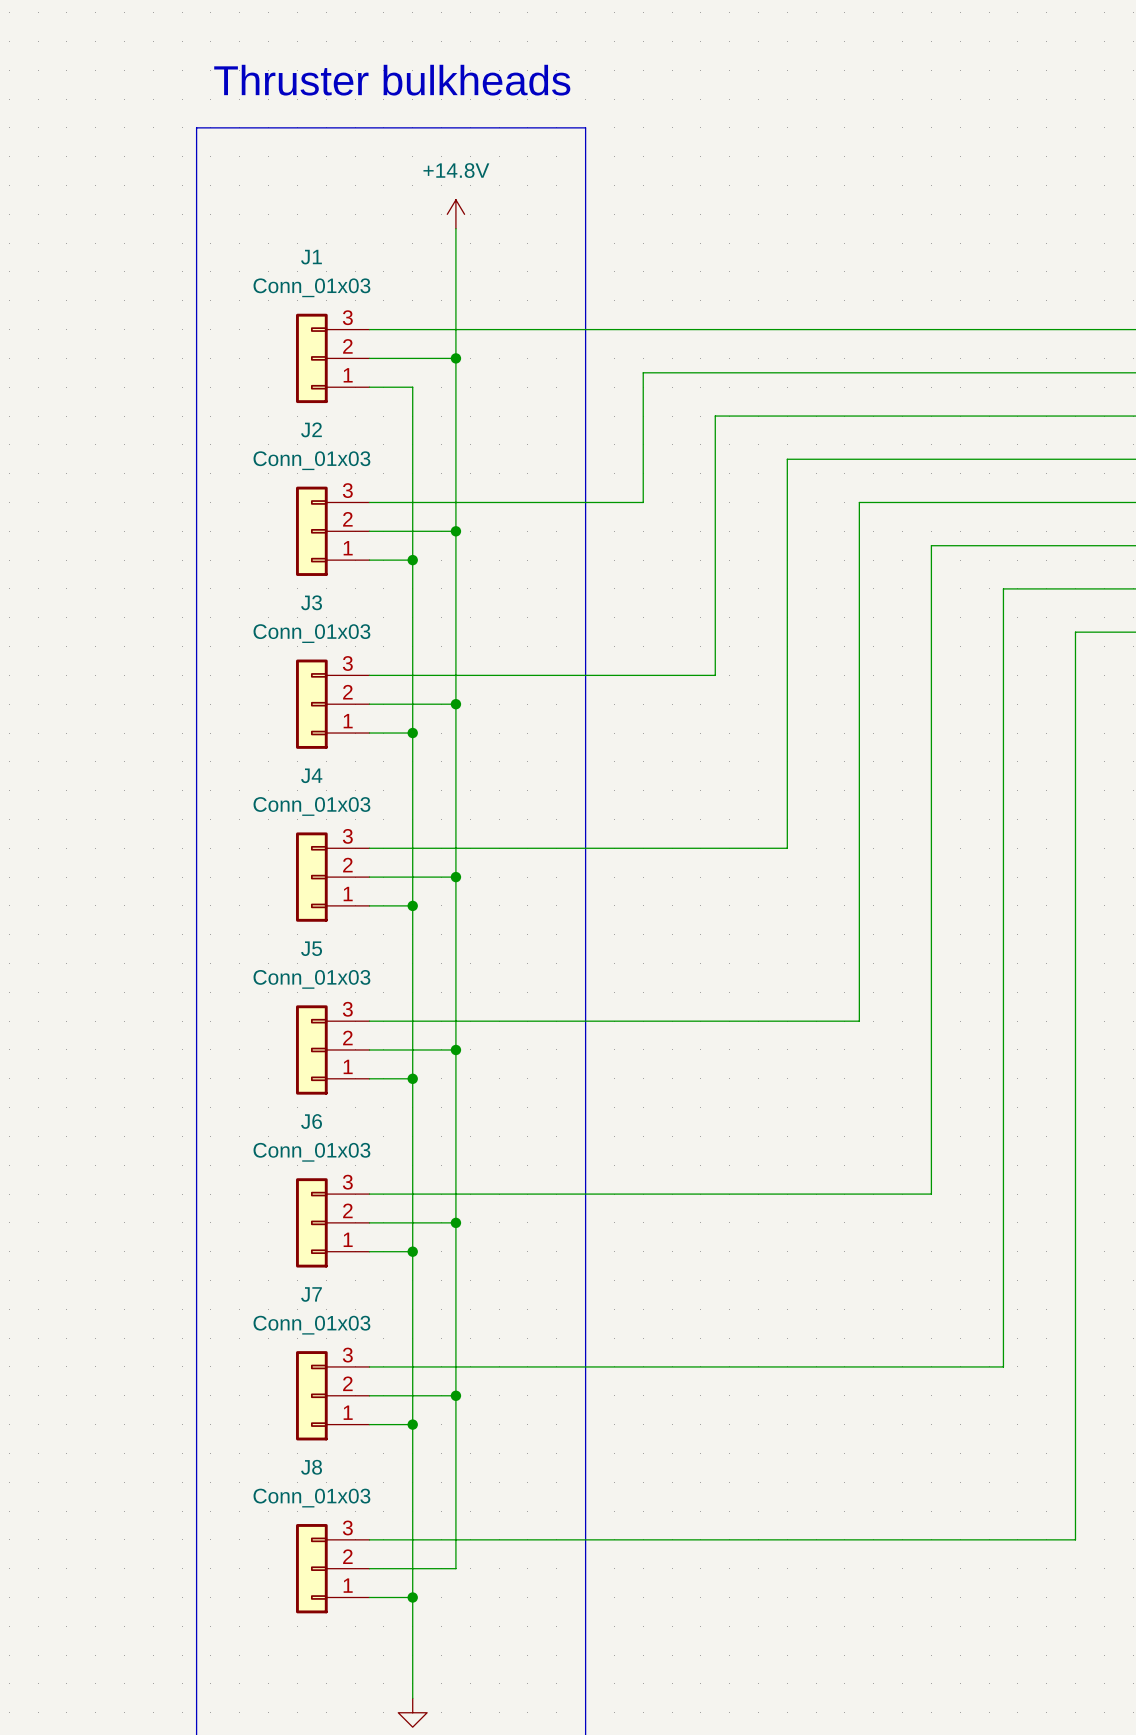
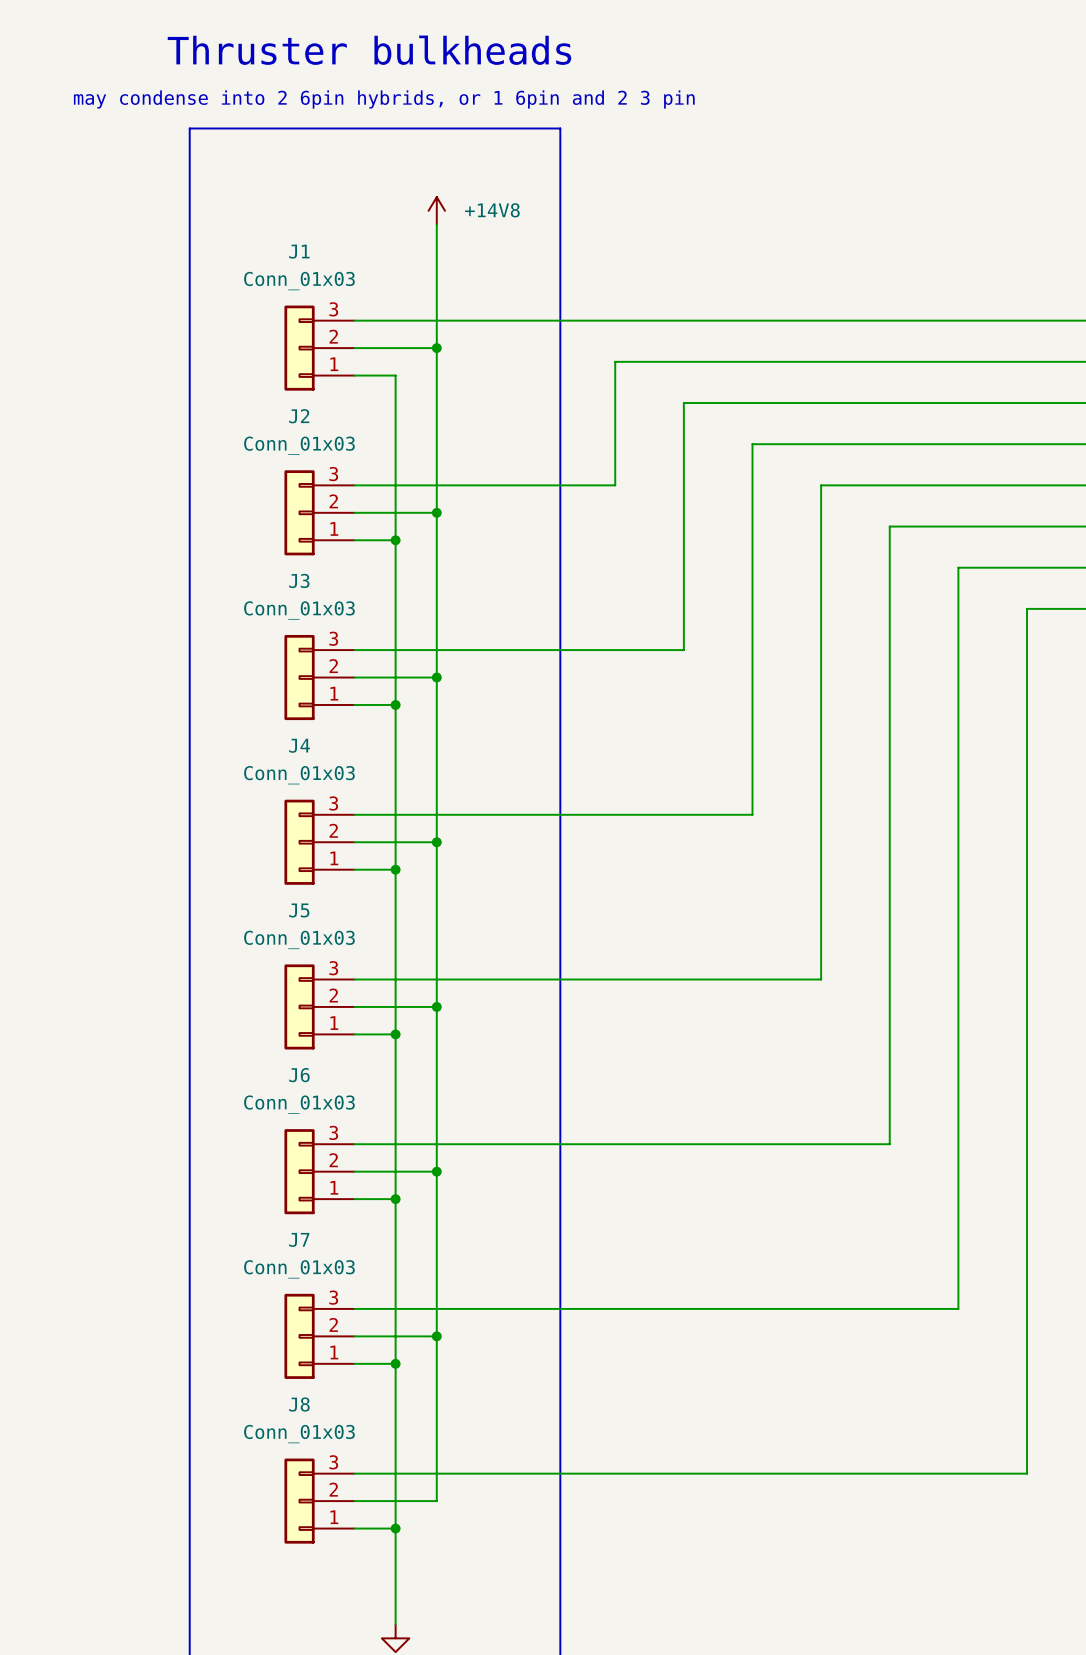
text position: Thruster bulkheads (392, 80) -> Thruster bulkheads (369, 50)
text: none -> may condense into 2 6pin hybrids, or 1 6pin and 2 3 pin (384, 99)
power symbol: +14.8V (455, 214) -> +14V8 (436, 210)

